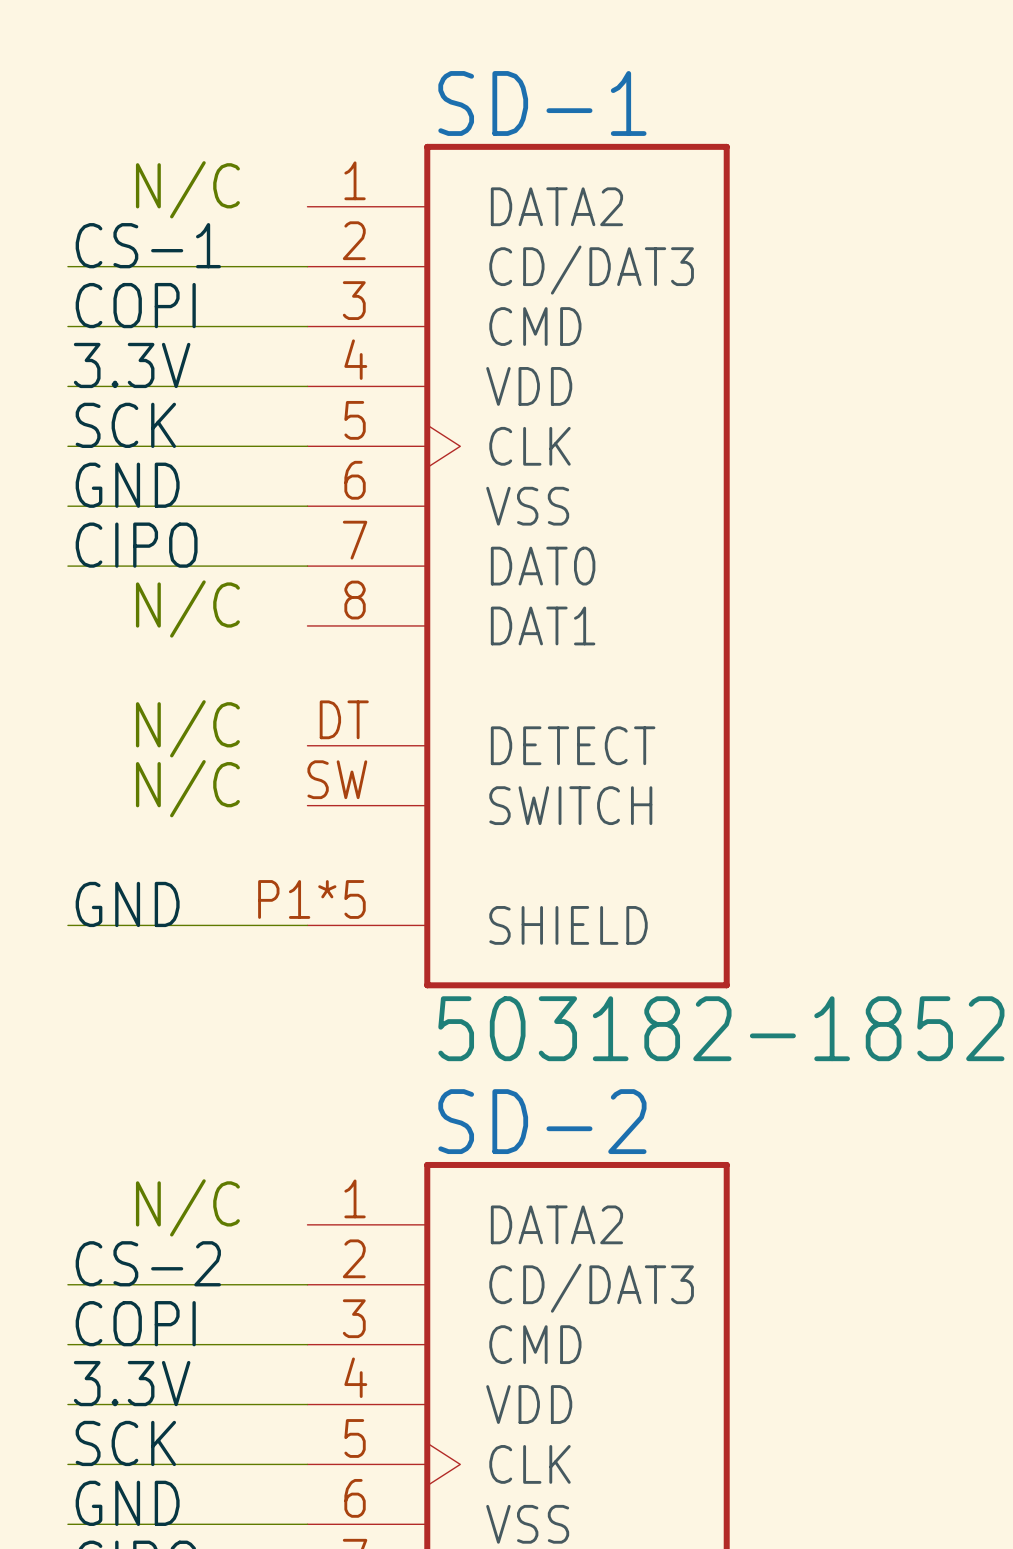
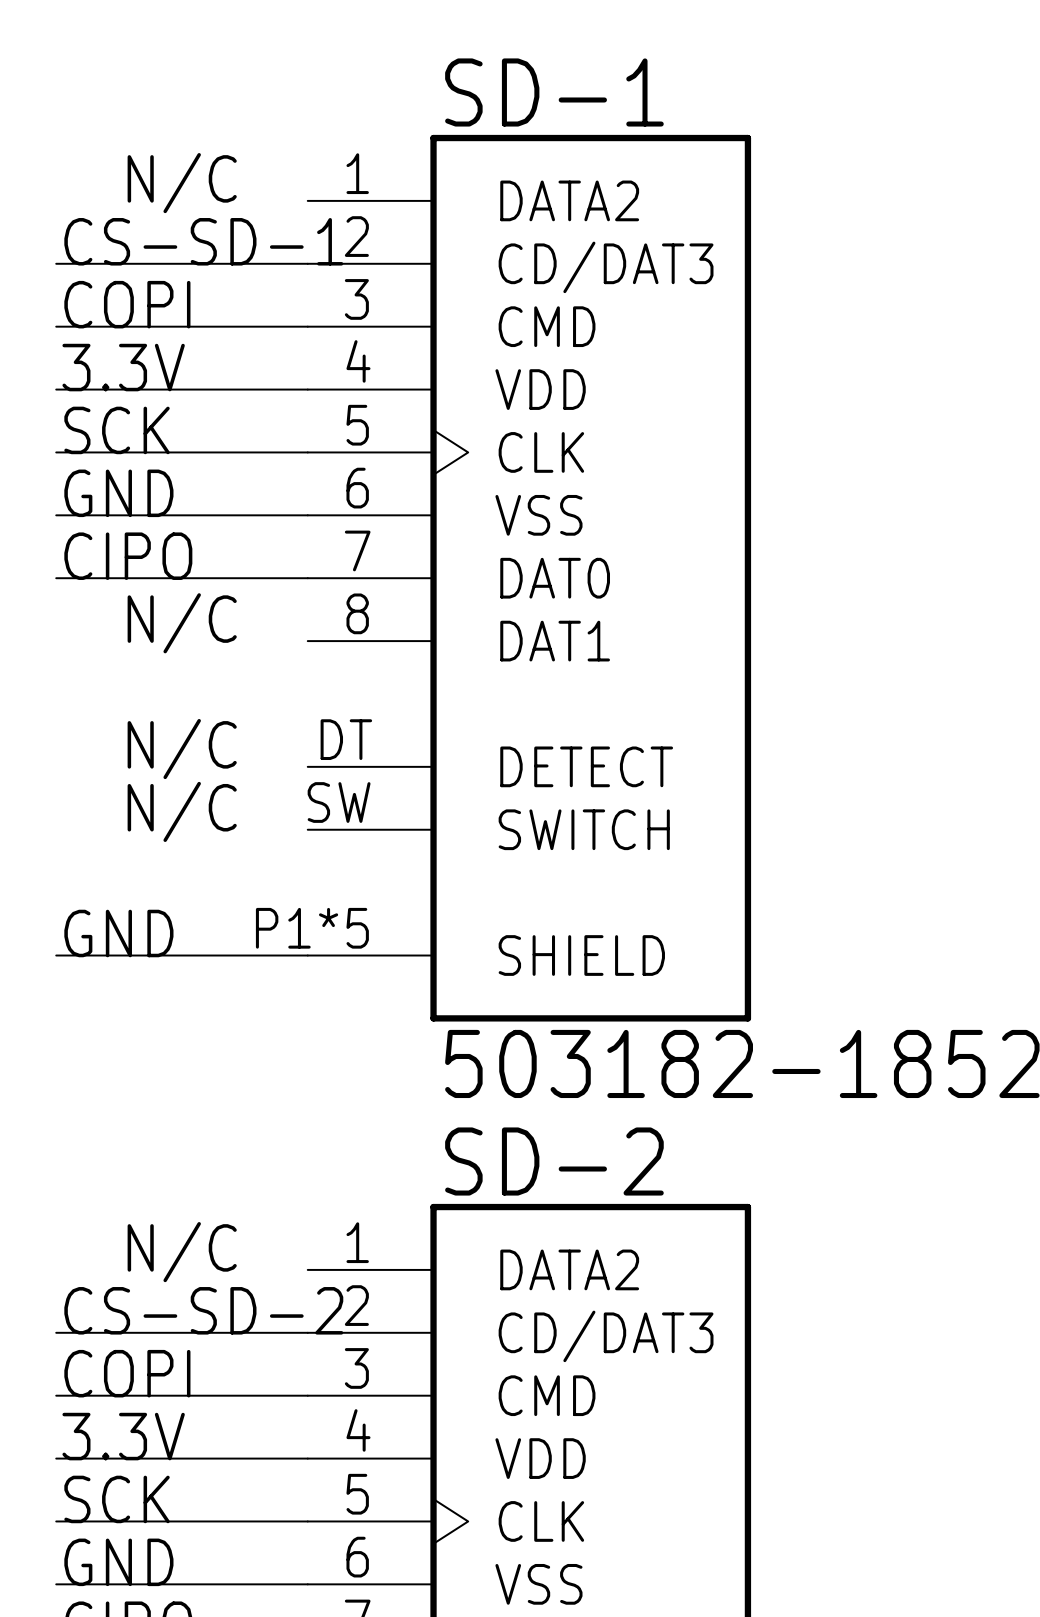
label: CS-1 (148, 245) -> CS-SD-1 (203, 241)
label: CS-2 (148, 1263) -> CS-SD-2 (203, 1310)

